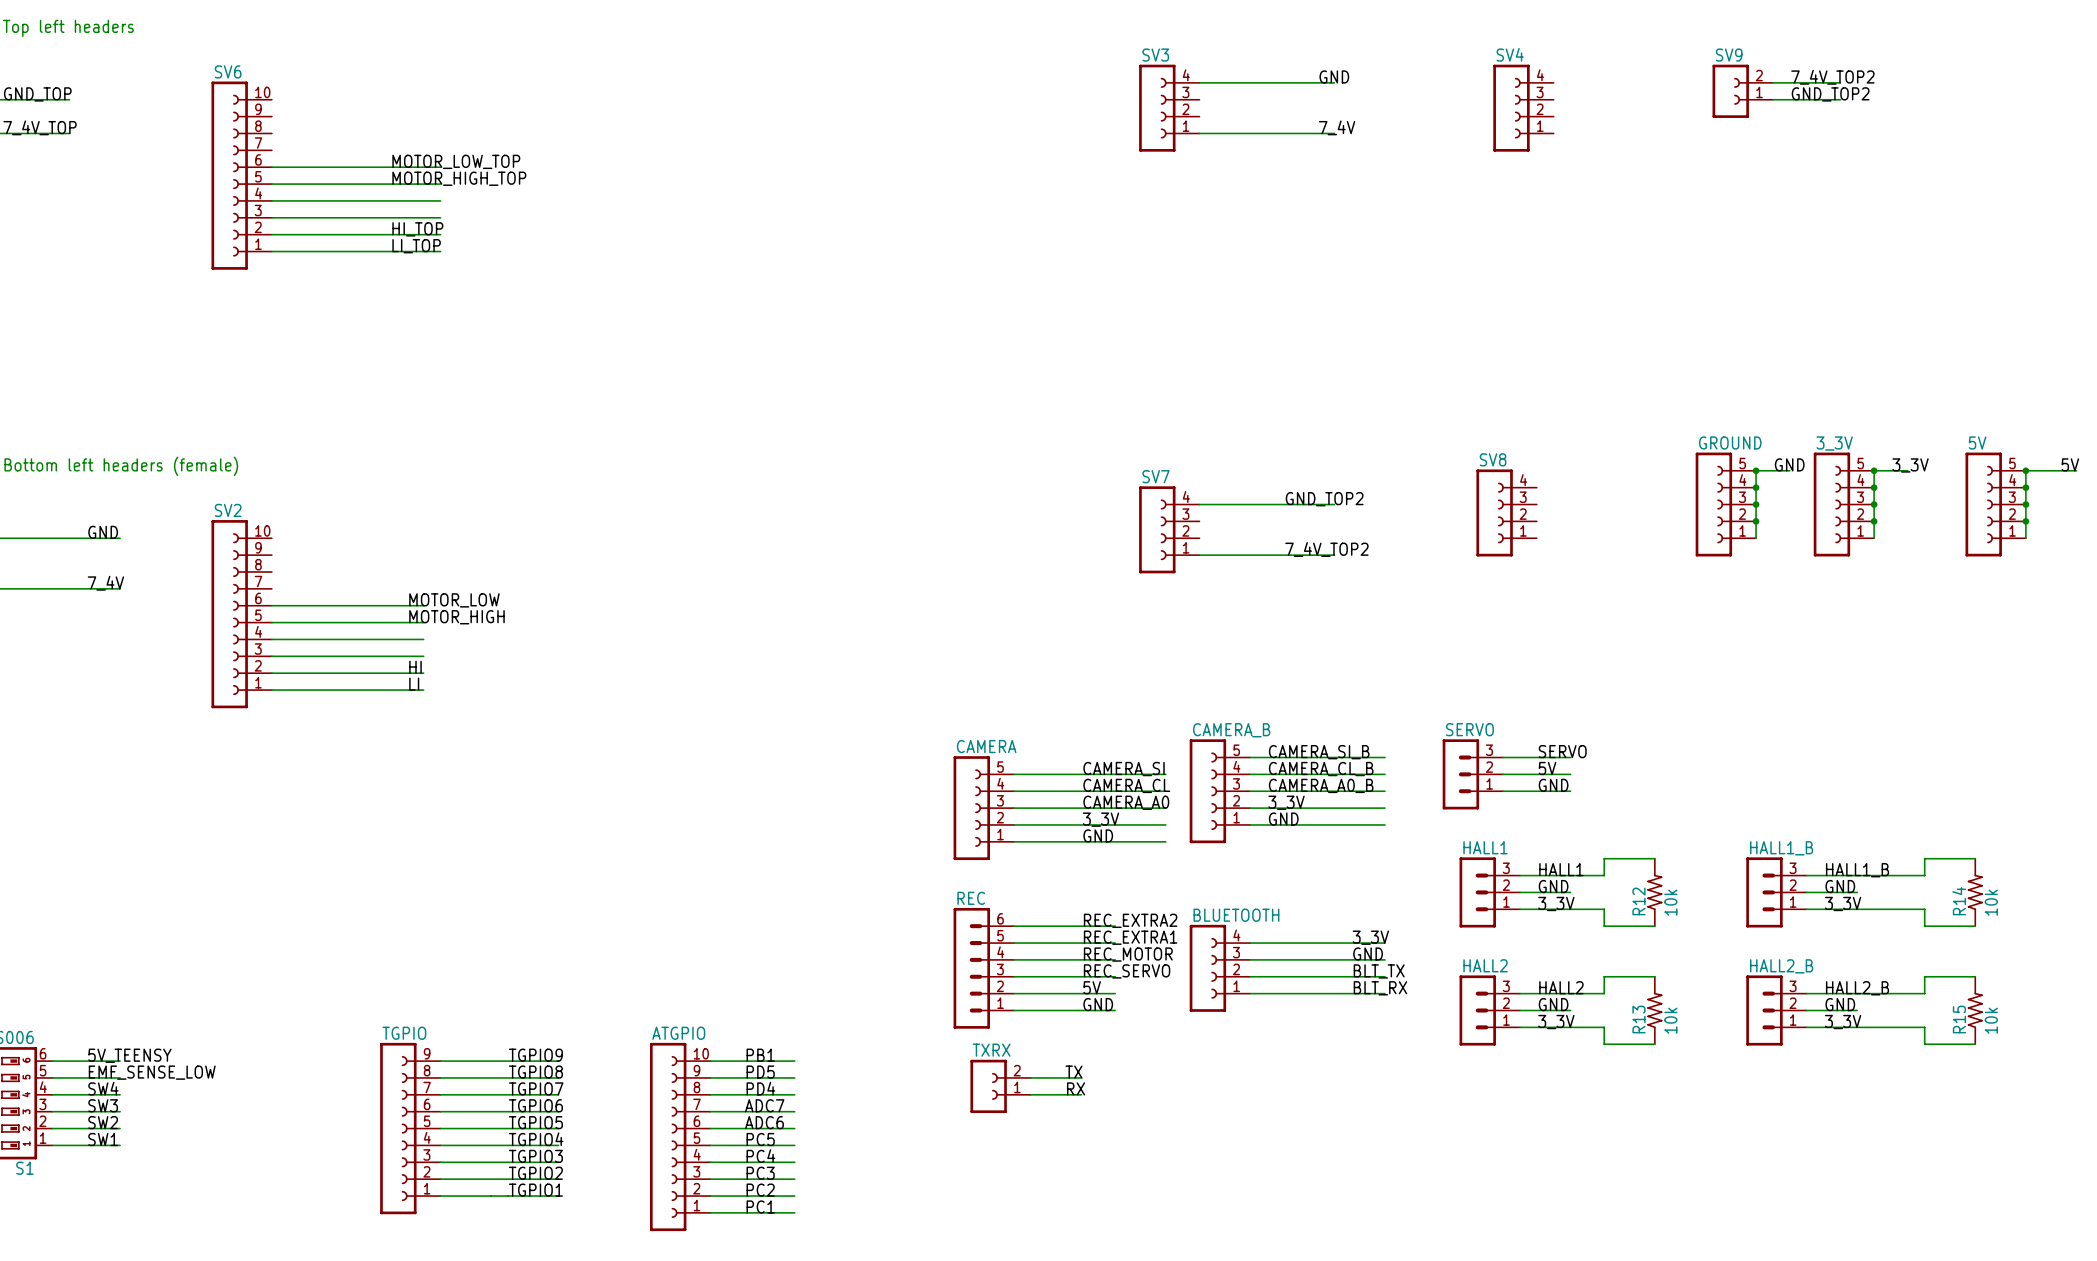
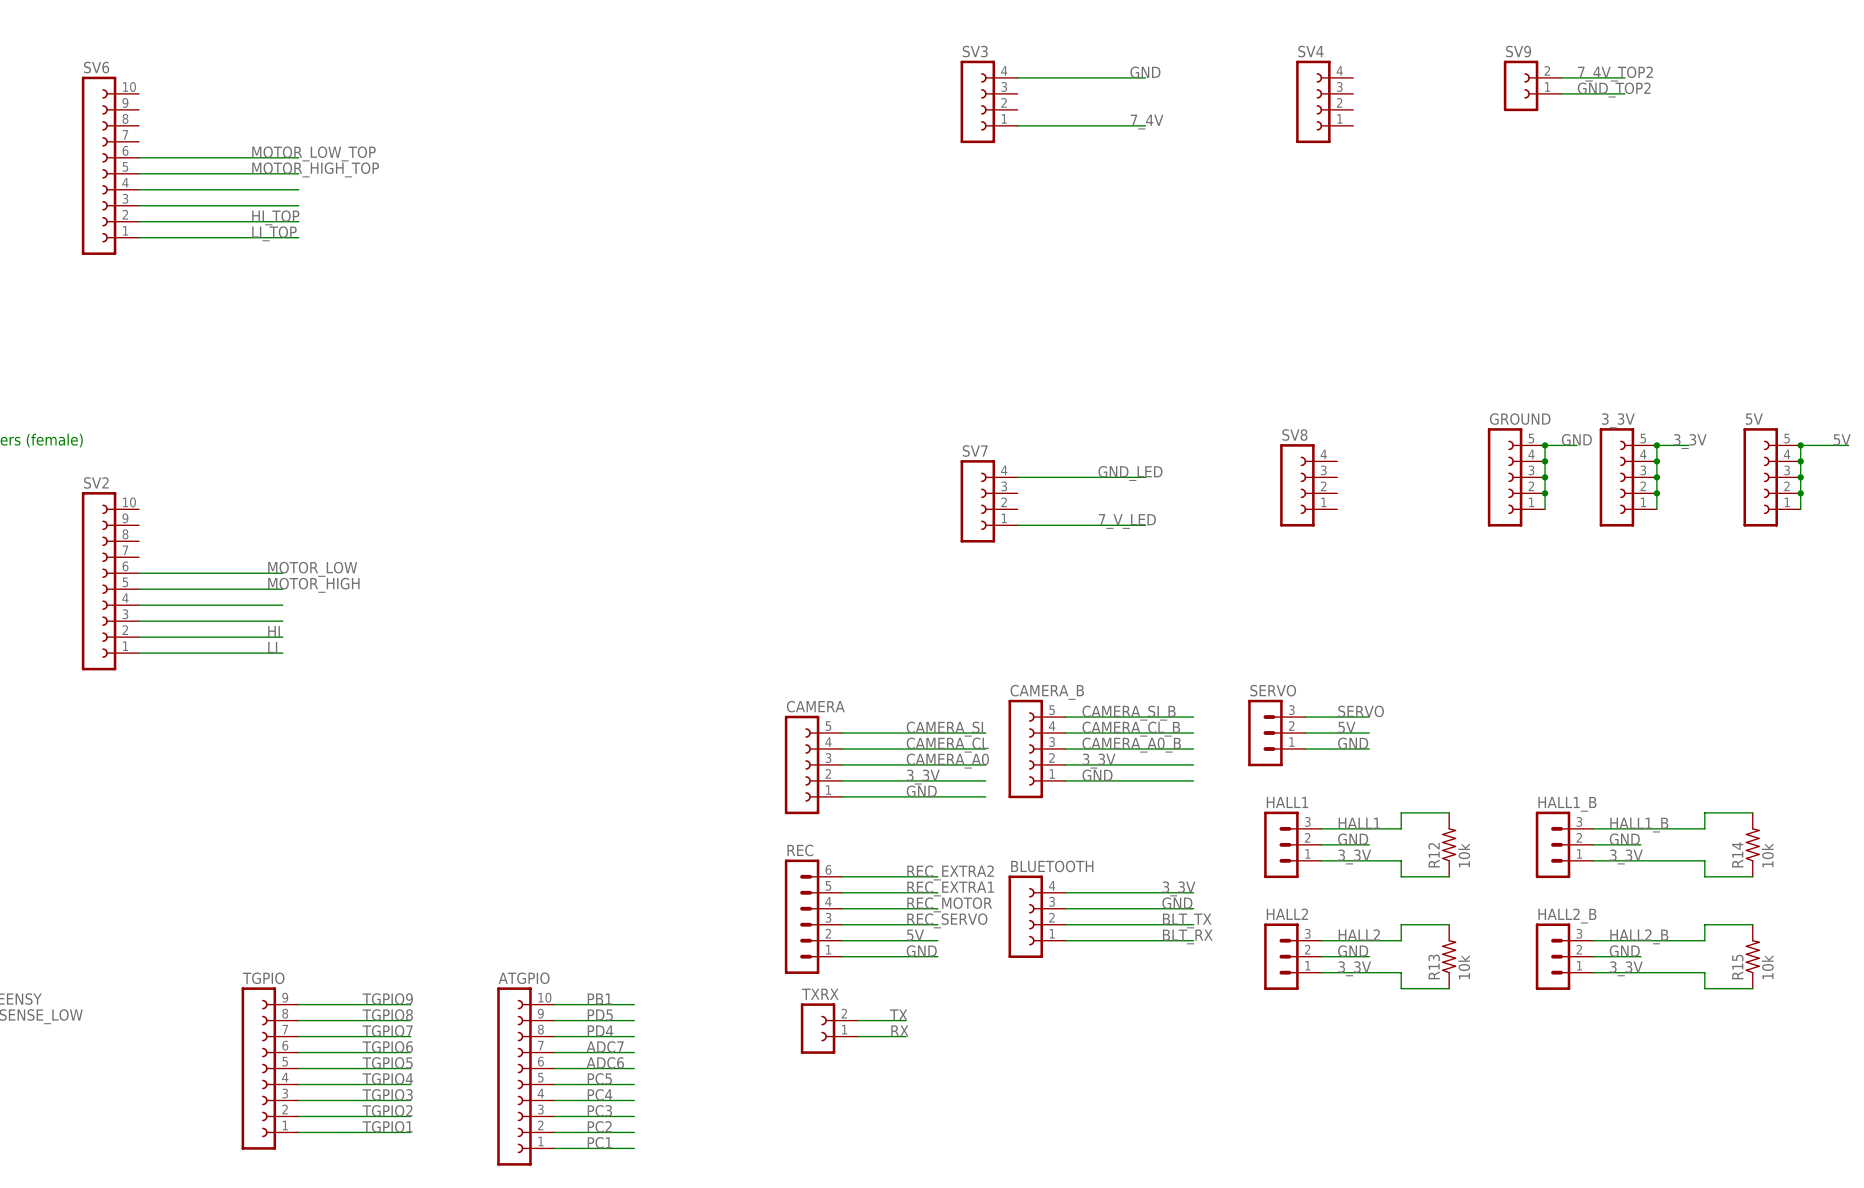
label: GND_TOP2 (1324, 499) -> GND_LED (1130, 473)
label: 7_4V_TOP2 (1326, 549) -> 7_V_LED (1127, 521)

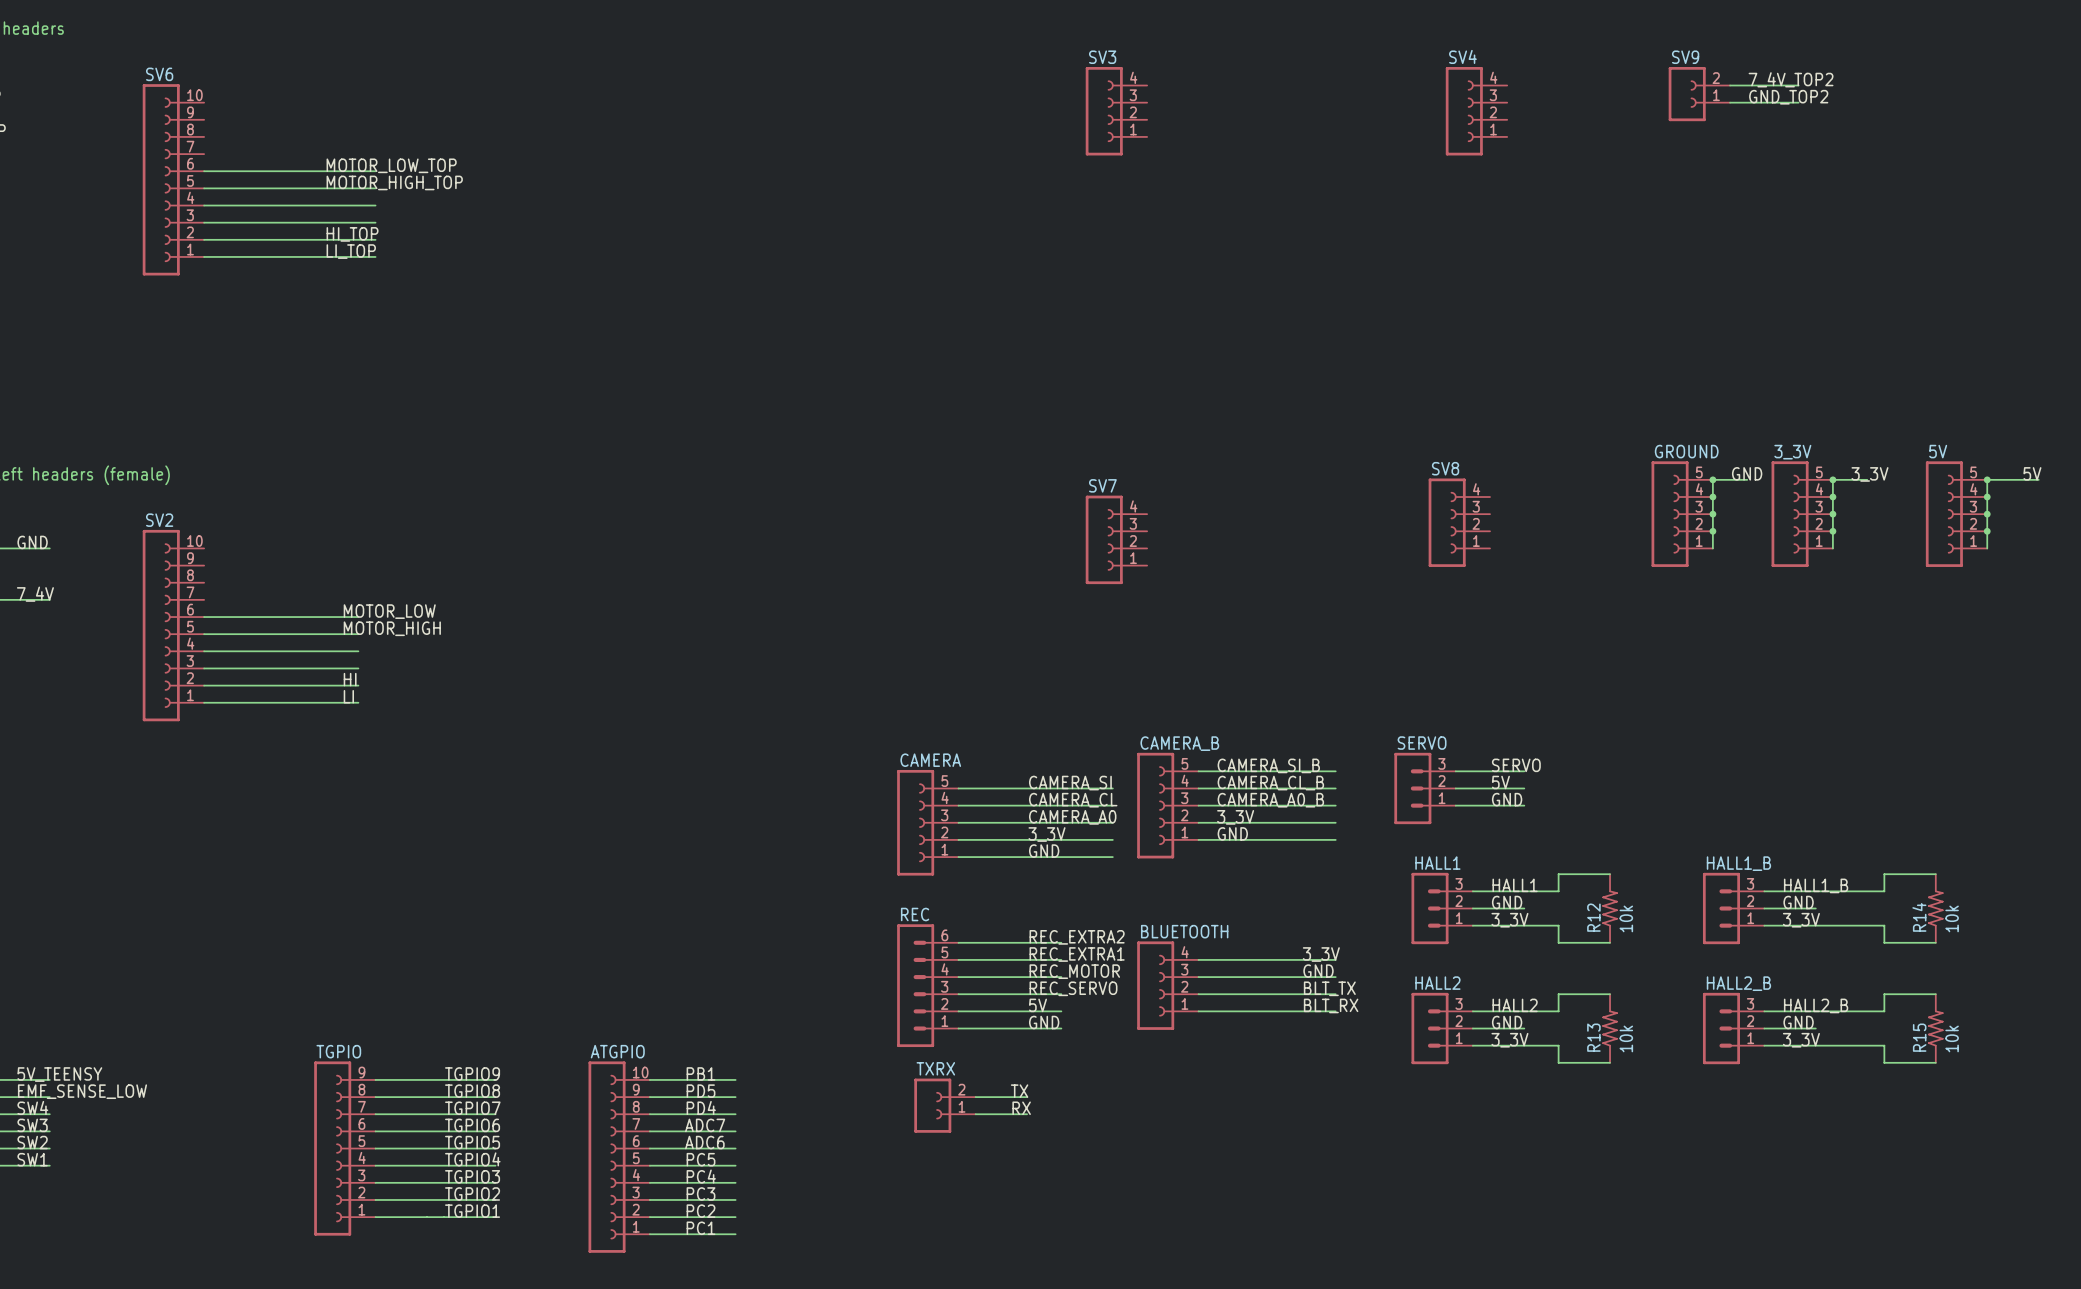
label: GND (1145, 72) -> none
wire: (1017, 77) (1145, 77) -> none
label: 7_4V (1147, 122) -> none
wire: (1017, 125) (1145, 125) -> none
label: GND_LED (1130, 473) -> none
wire: (1017, 477) (1145, 477) -> none
label: 7_V_LED (1127, 521) -> none
wire: (1017, 525) (1145, 525) -> none

